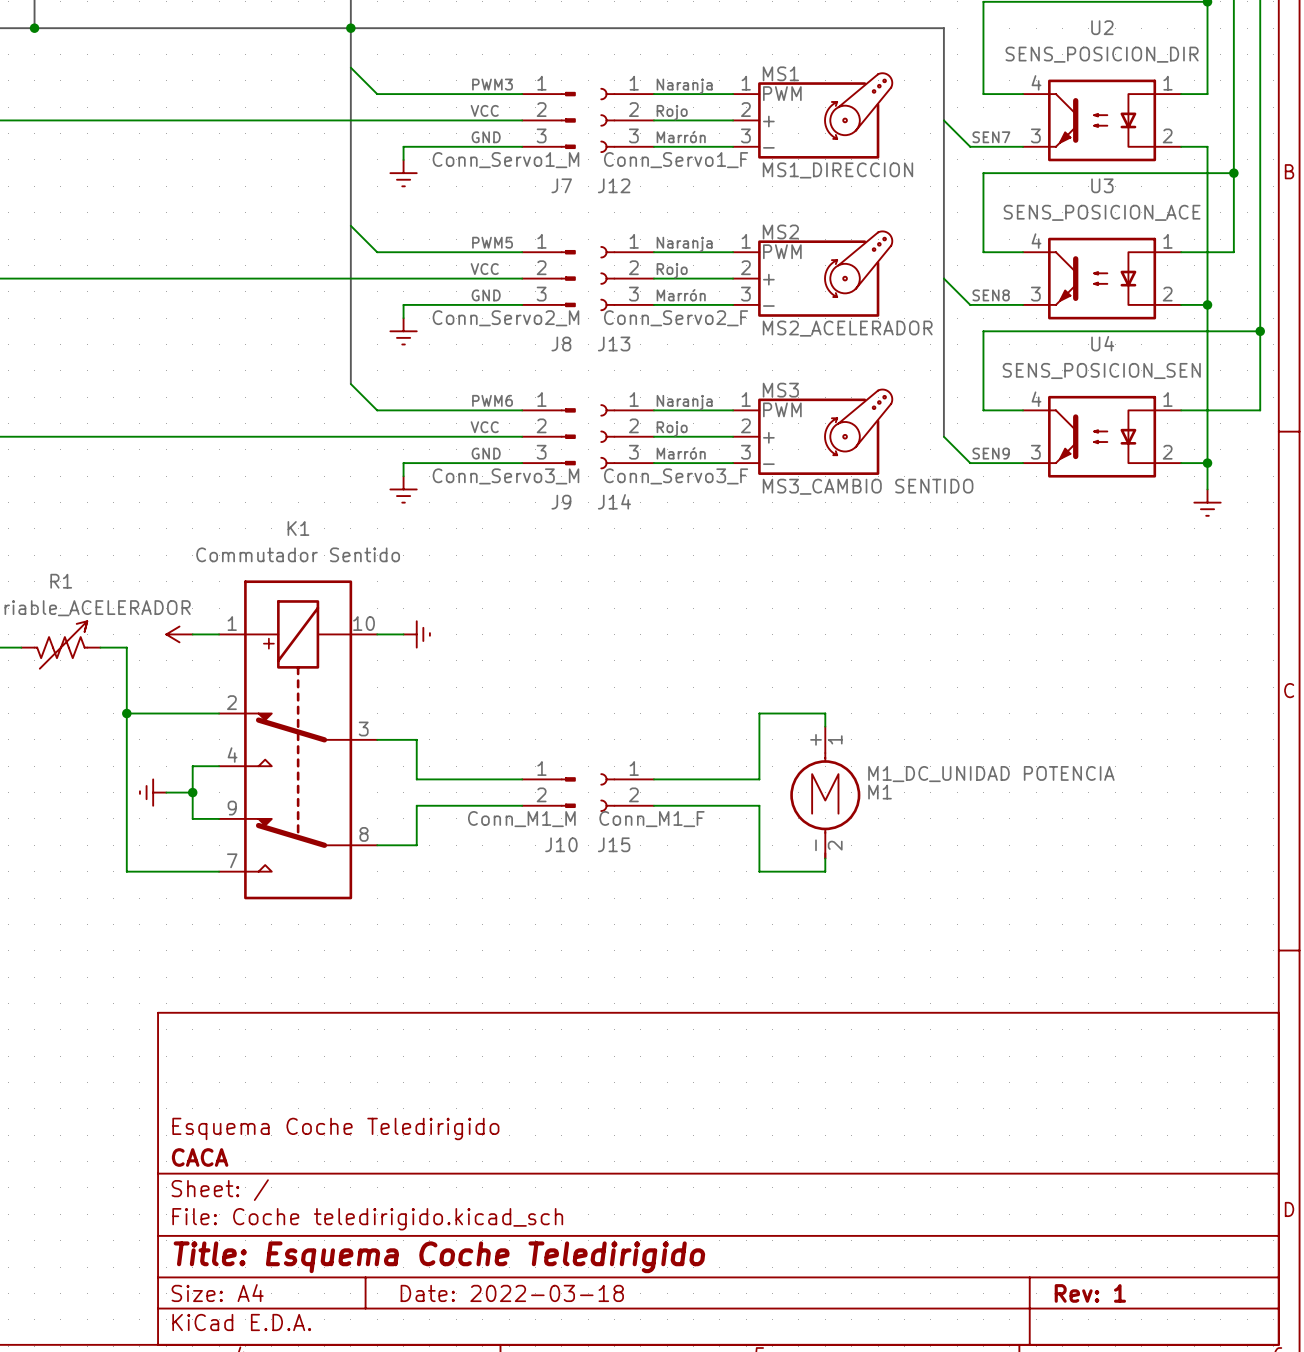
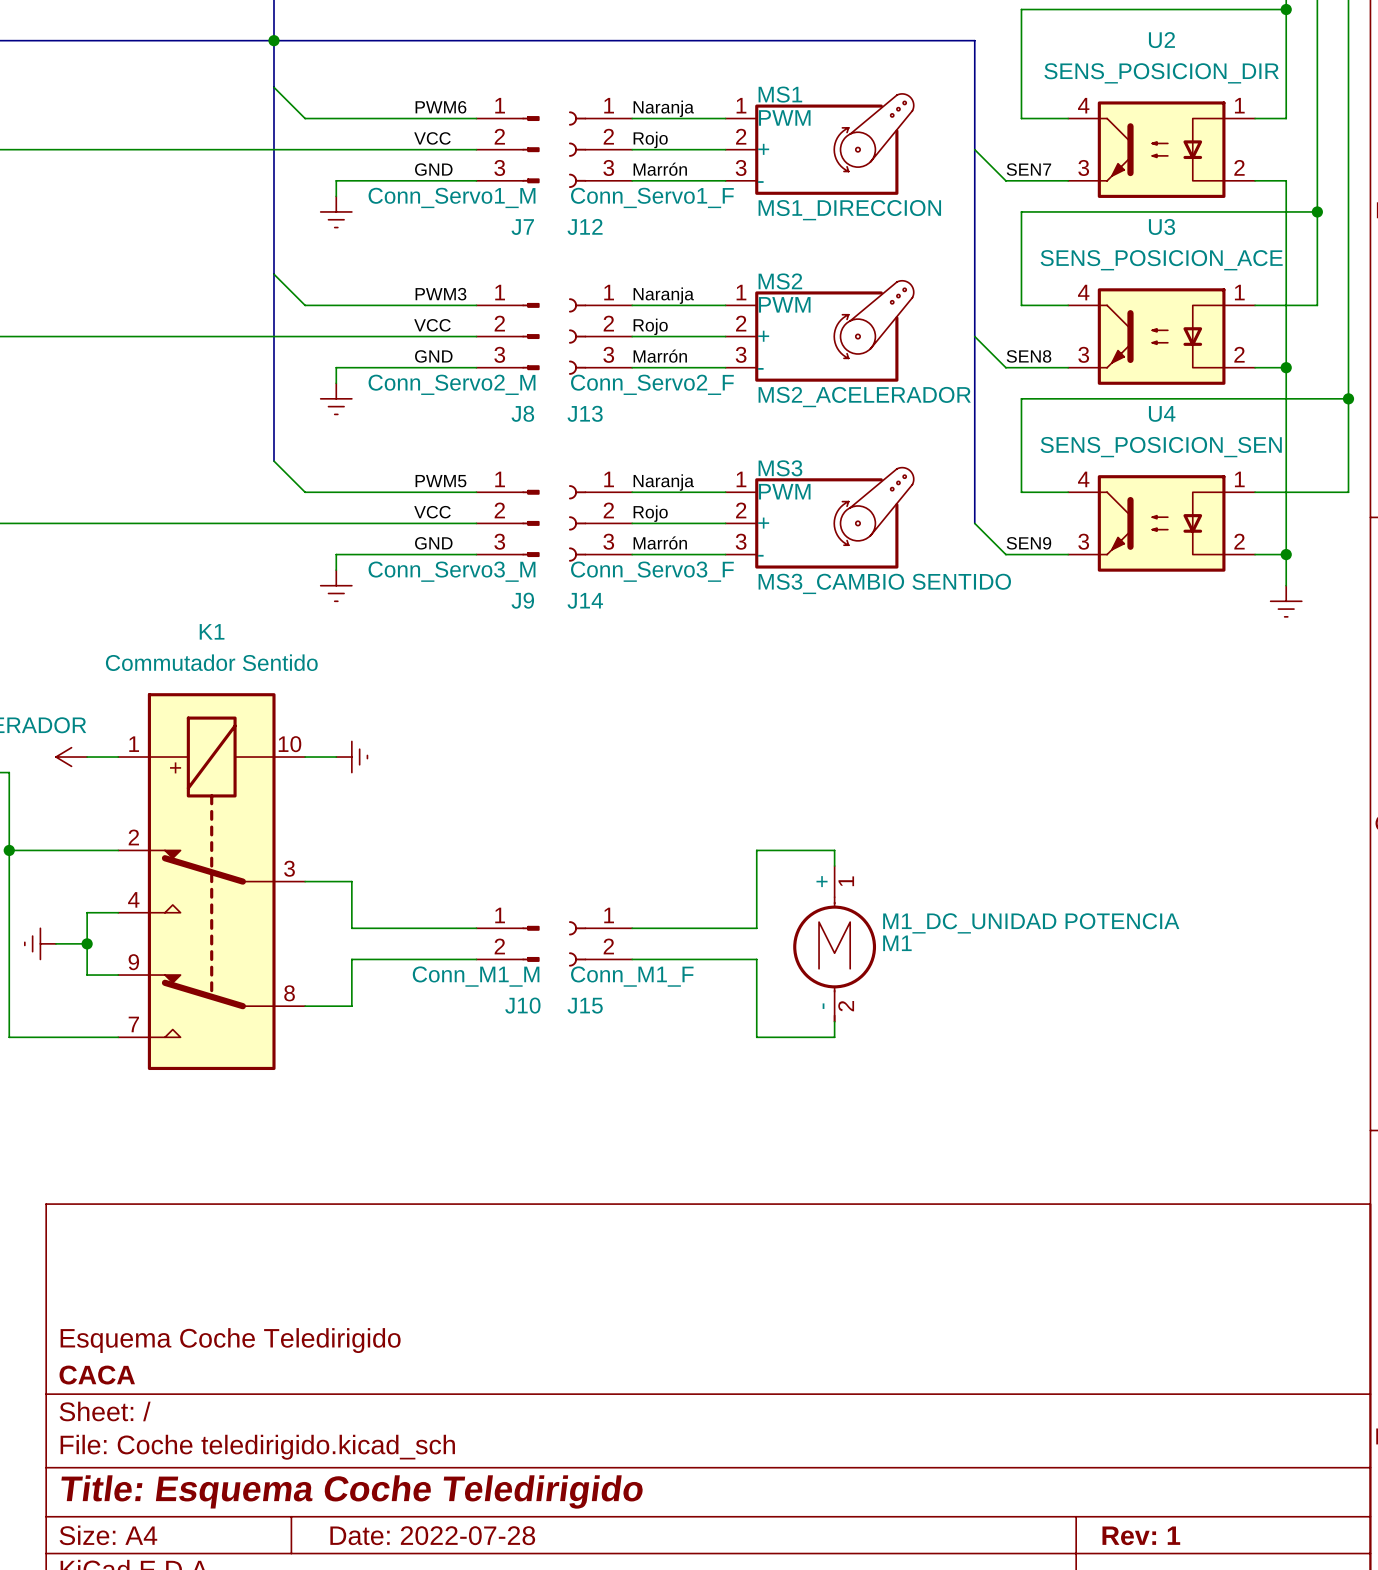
label: PWM3 (492, 84) -> PWM6 (440, 107)
label: PWM5 (492, 242) -> PWM3 (440, 294)
label: PWM6 (492, 400) -> PWM5 (440, 481)
title block: Date: 2022-03-18 (512, 1293) -> Date: 2022-07-28 (432, 1535)

